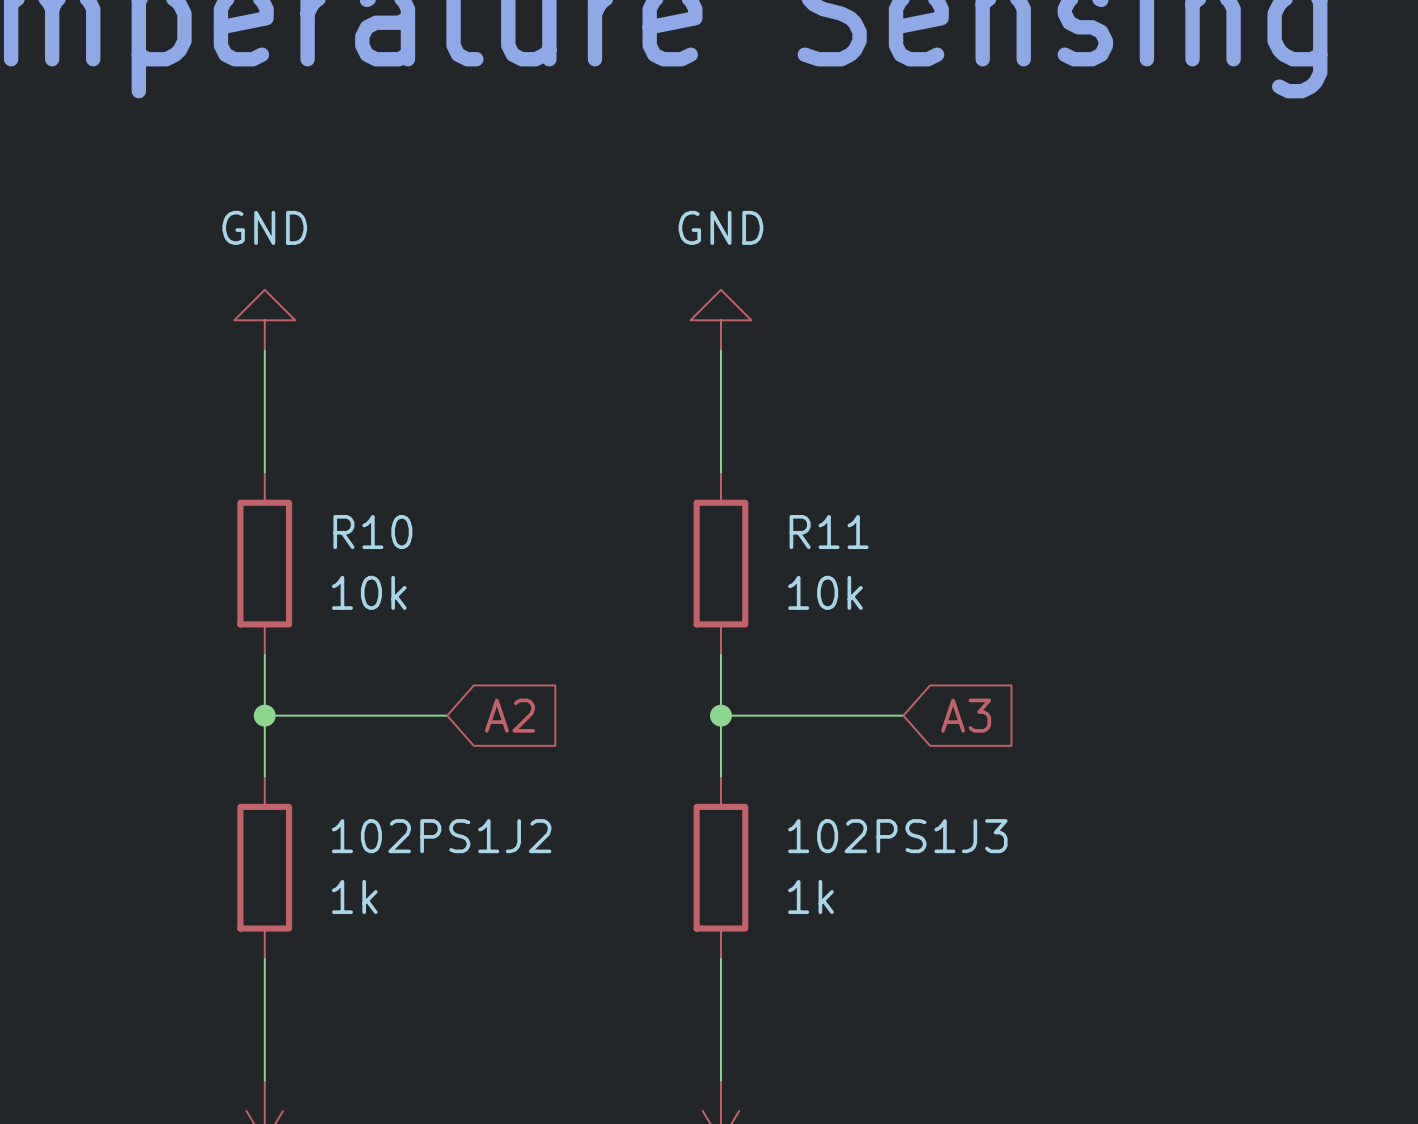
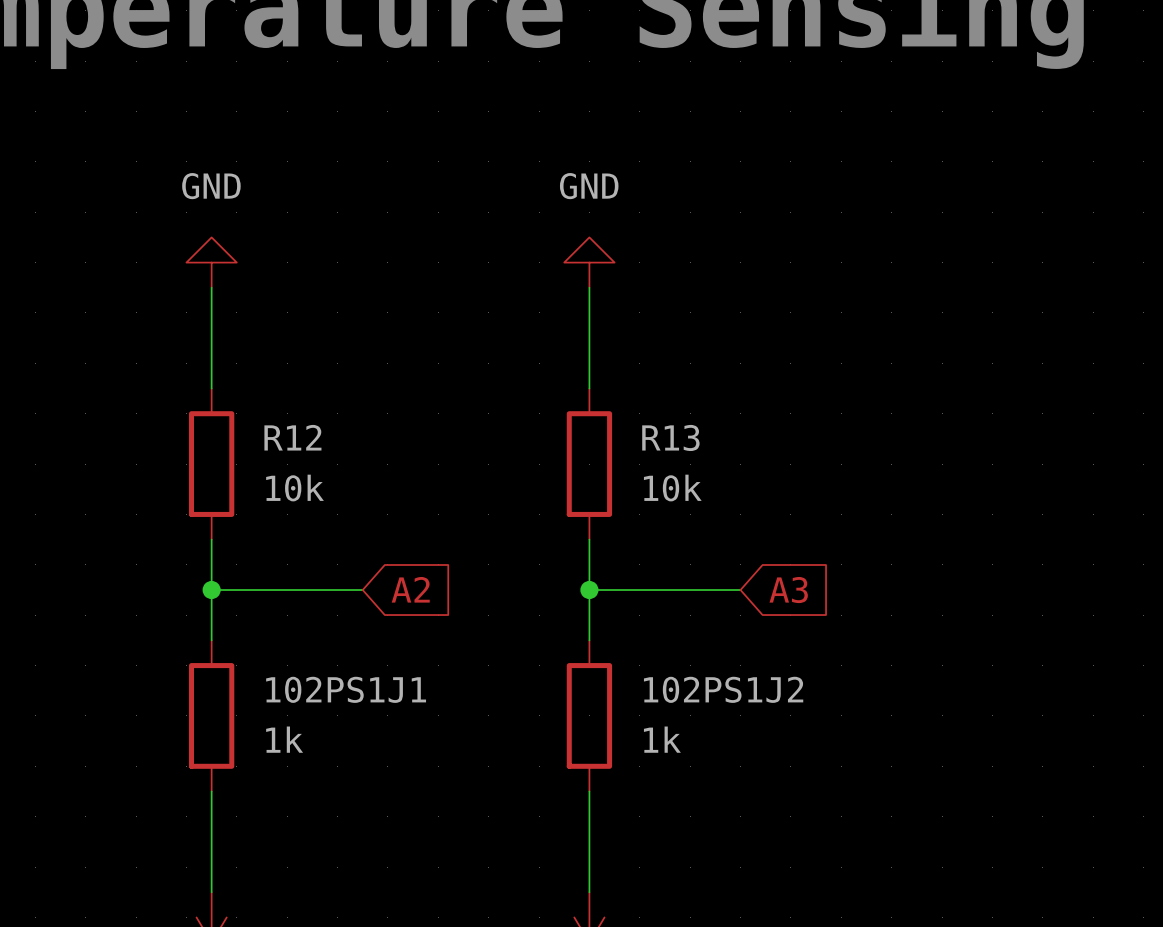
R10 name: R10 (372, 532) -> R12 (292, 437)
R11 name: R11 (829, 532) -> R13 (670, 437)
102PS1J2 name: 102PS1J2 (441, 836) -> 102PS1J1 (346, 689)
102PS1J3 name: 102PS1J3 (897, 836) -> 102PS1J2 (723, 689)

